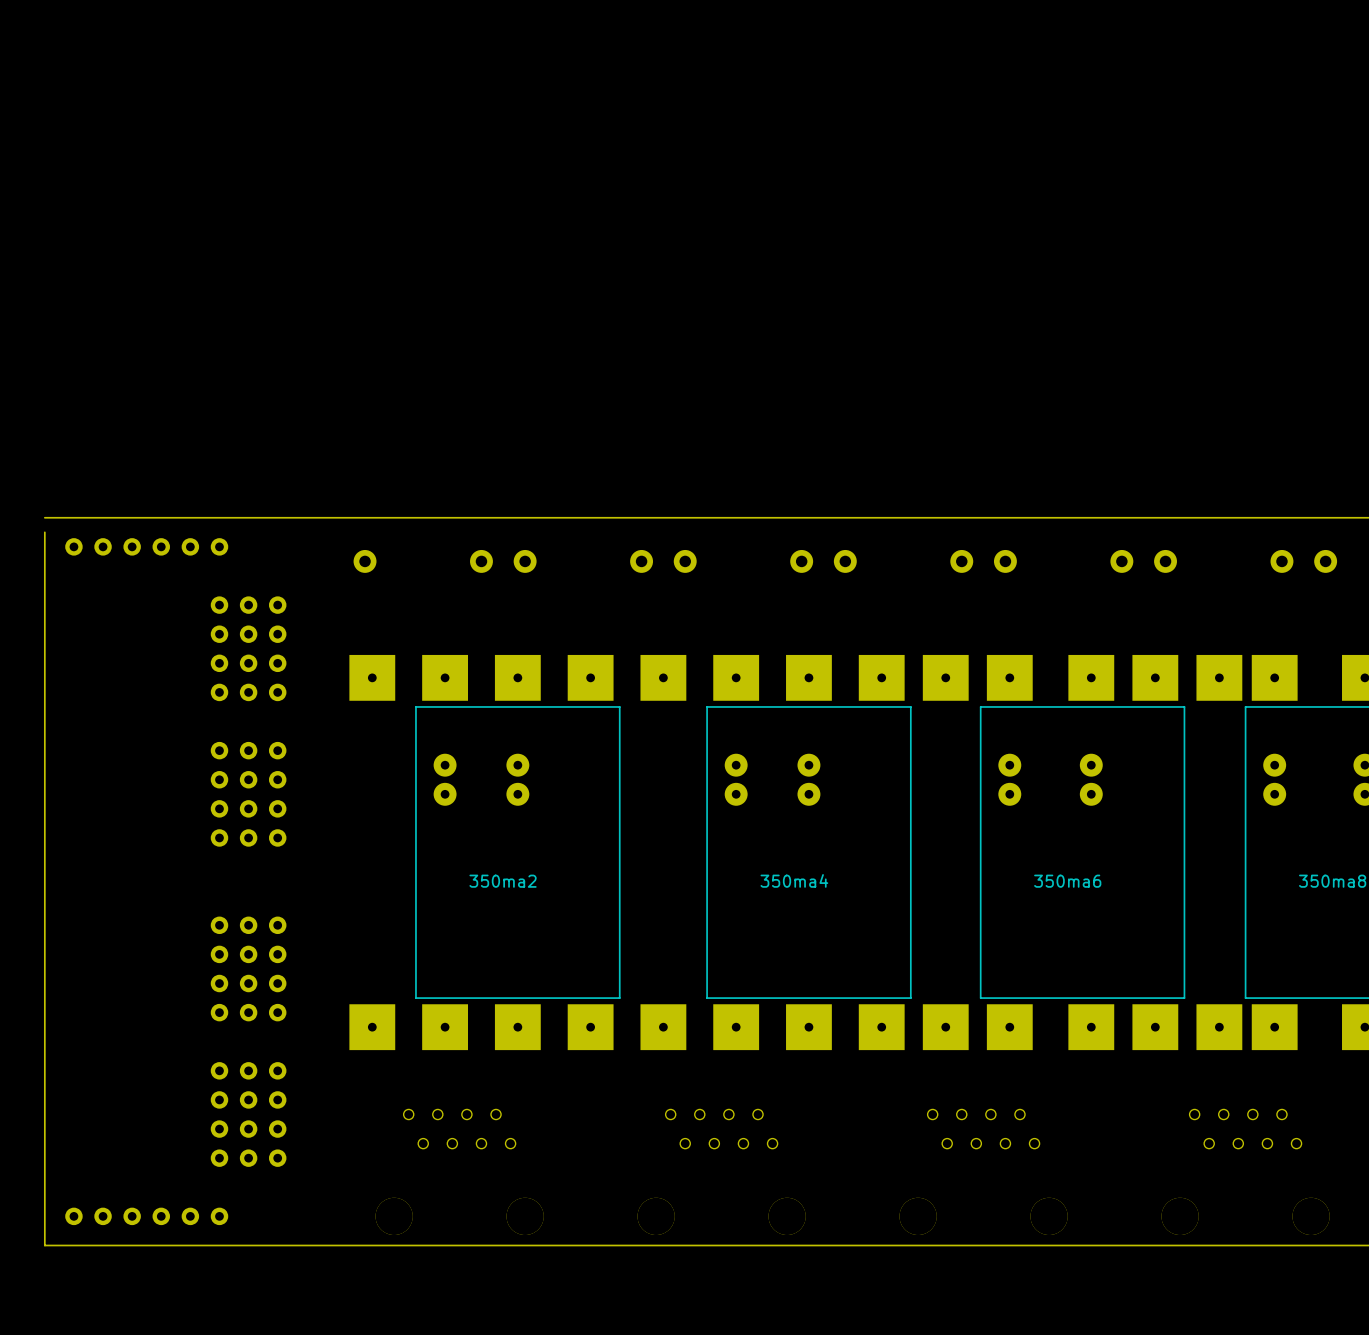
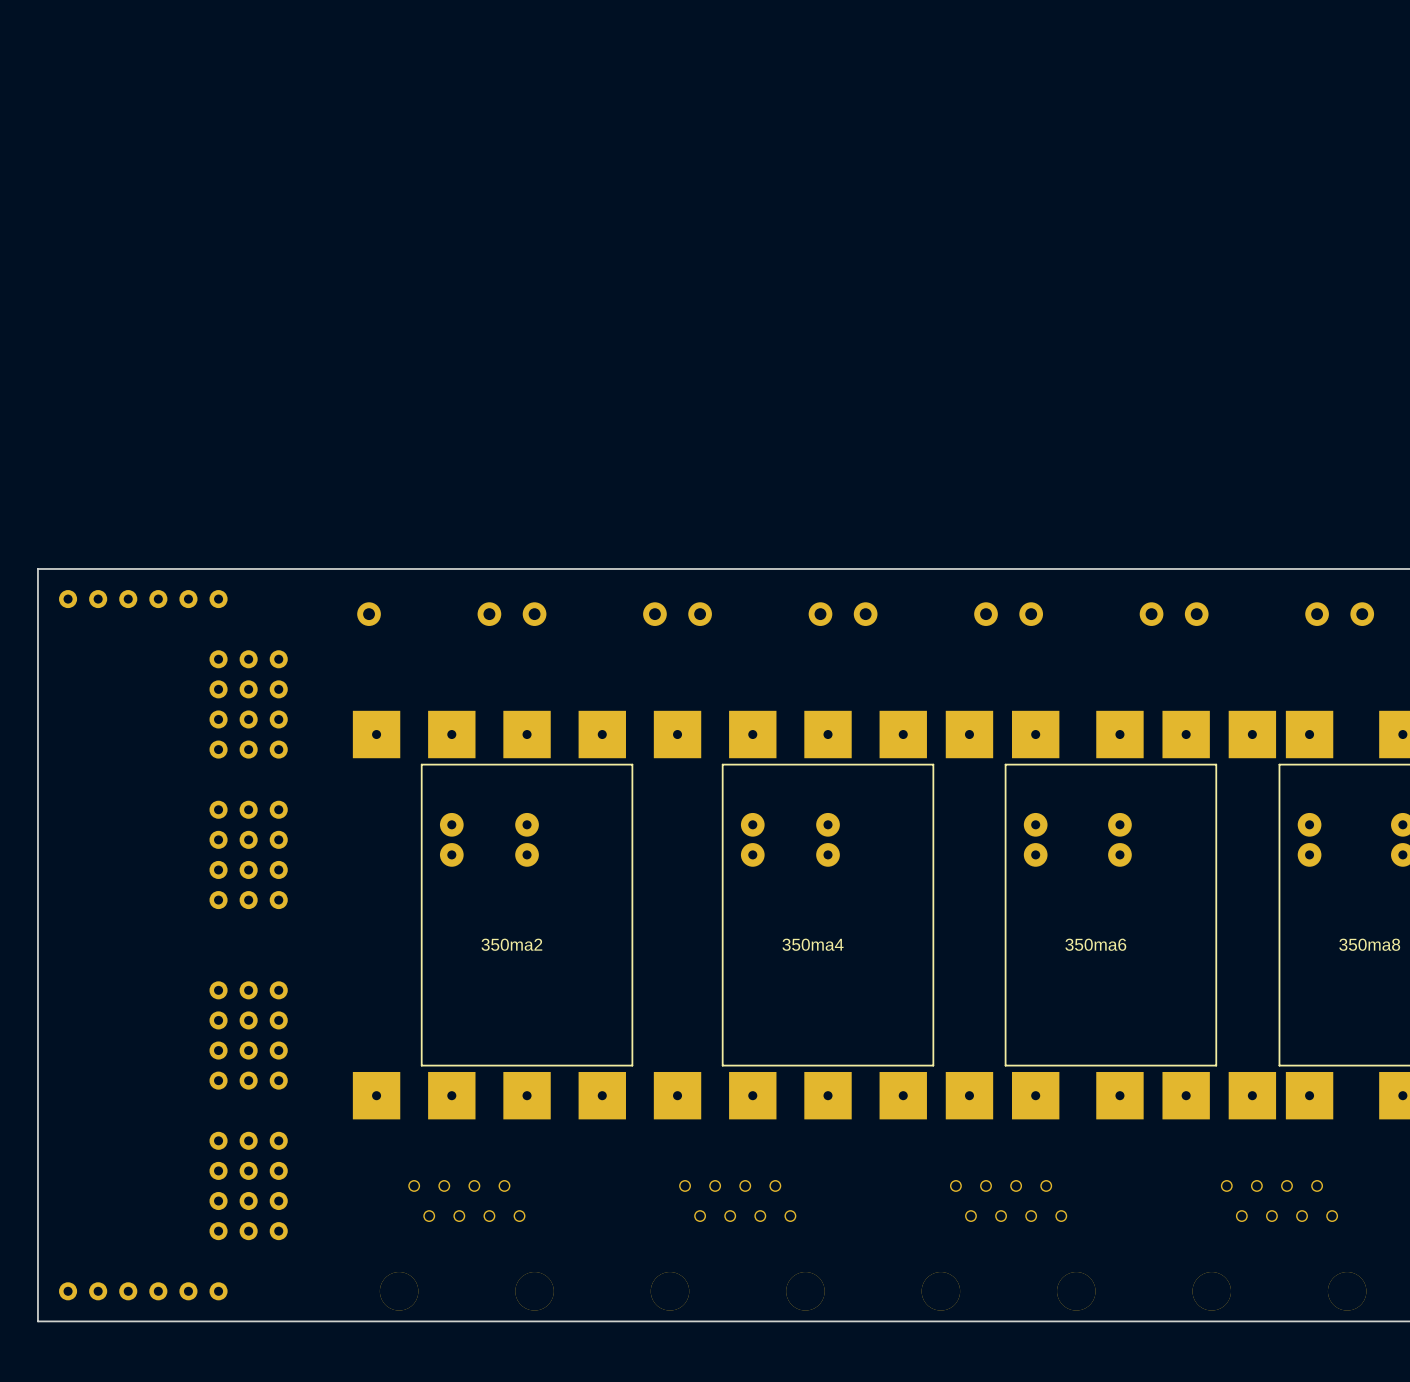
board edge: none -> (37, 568) (37, 584)

